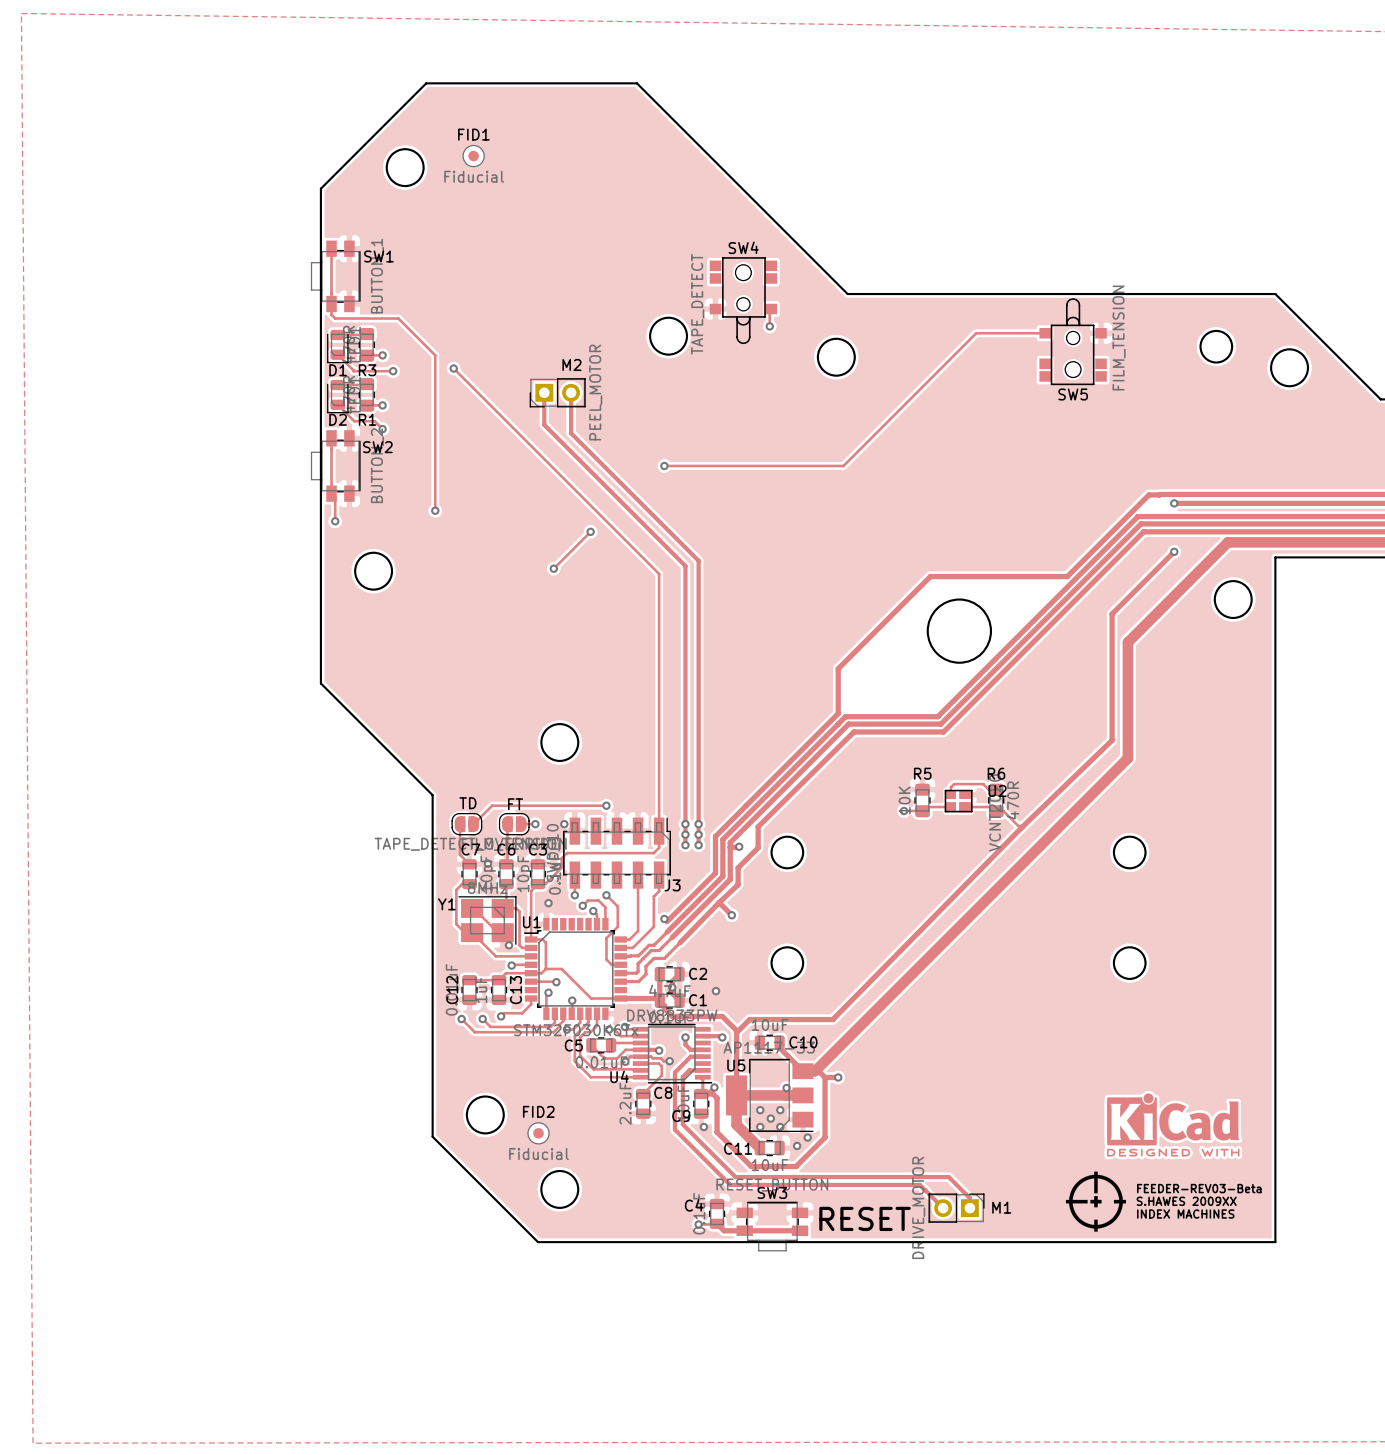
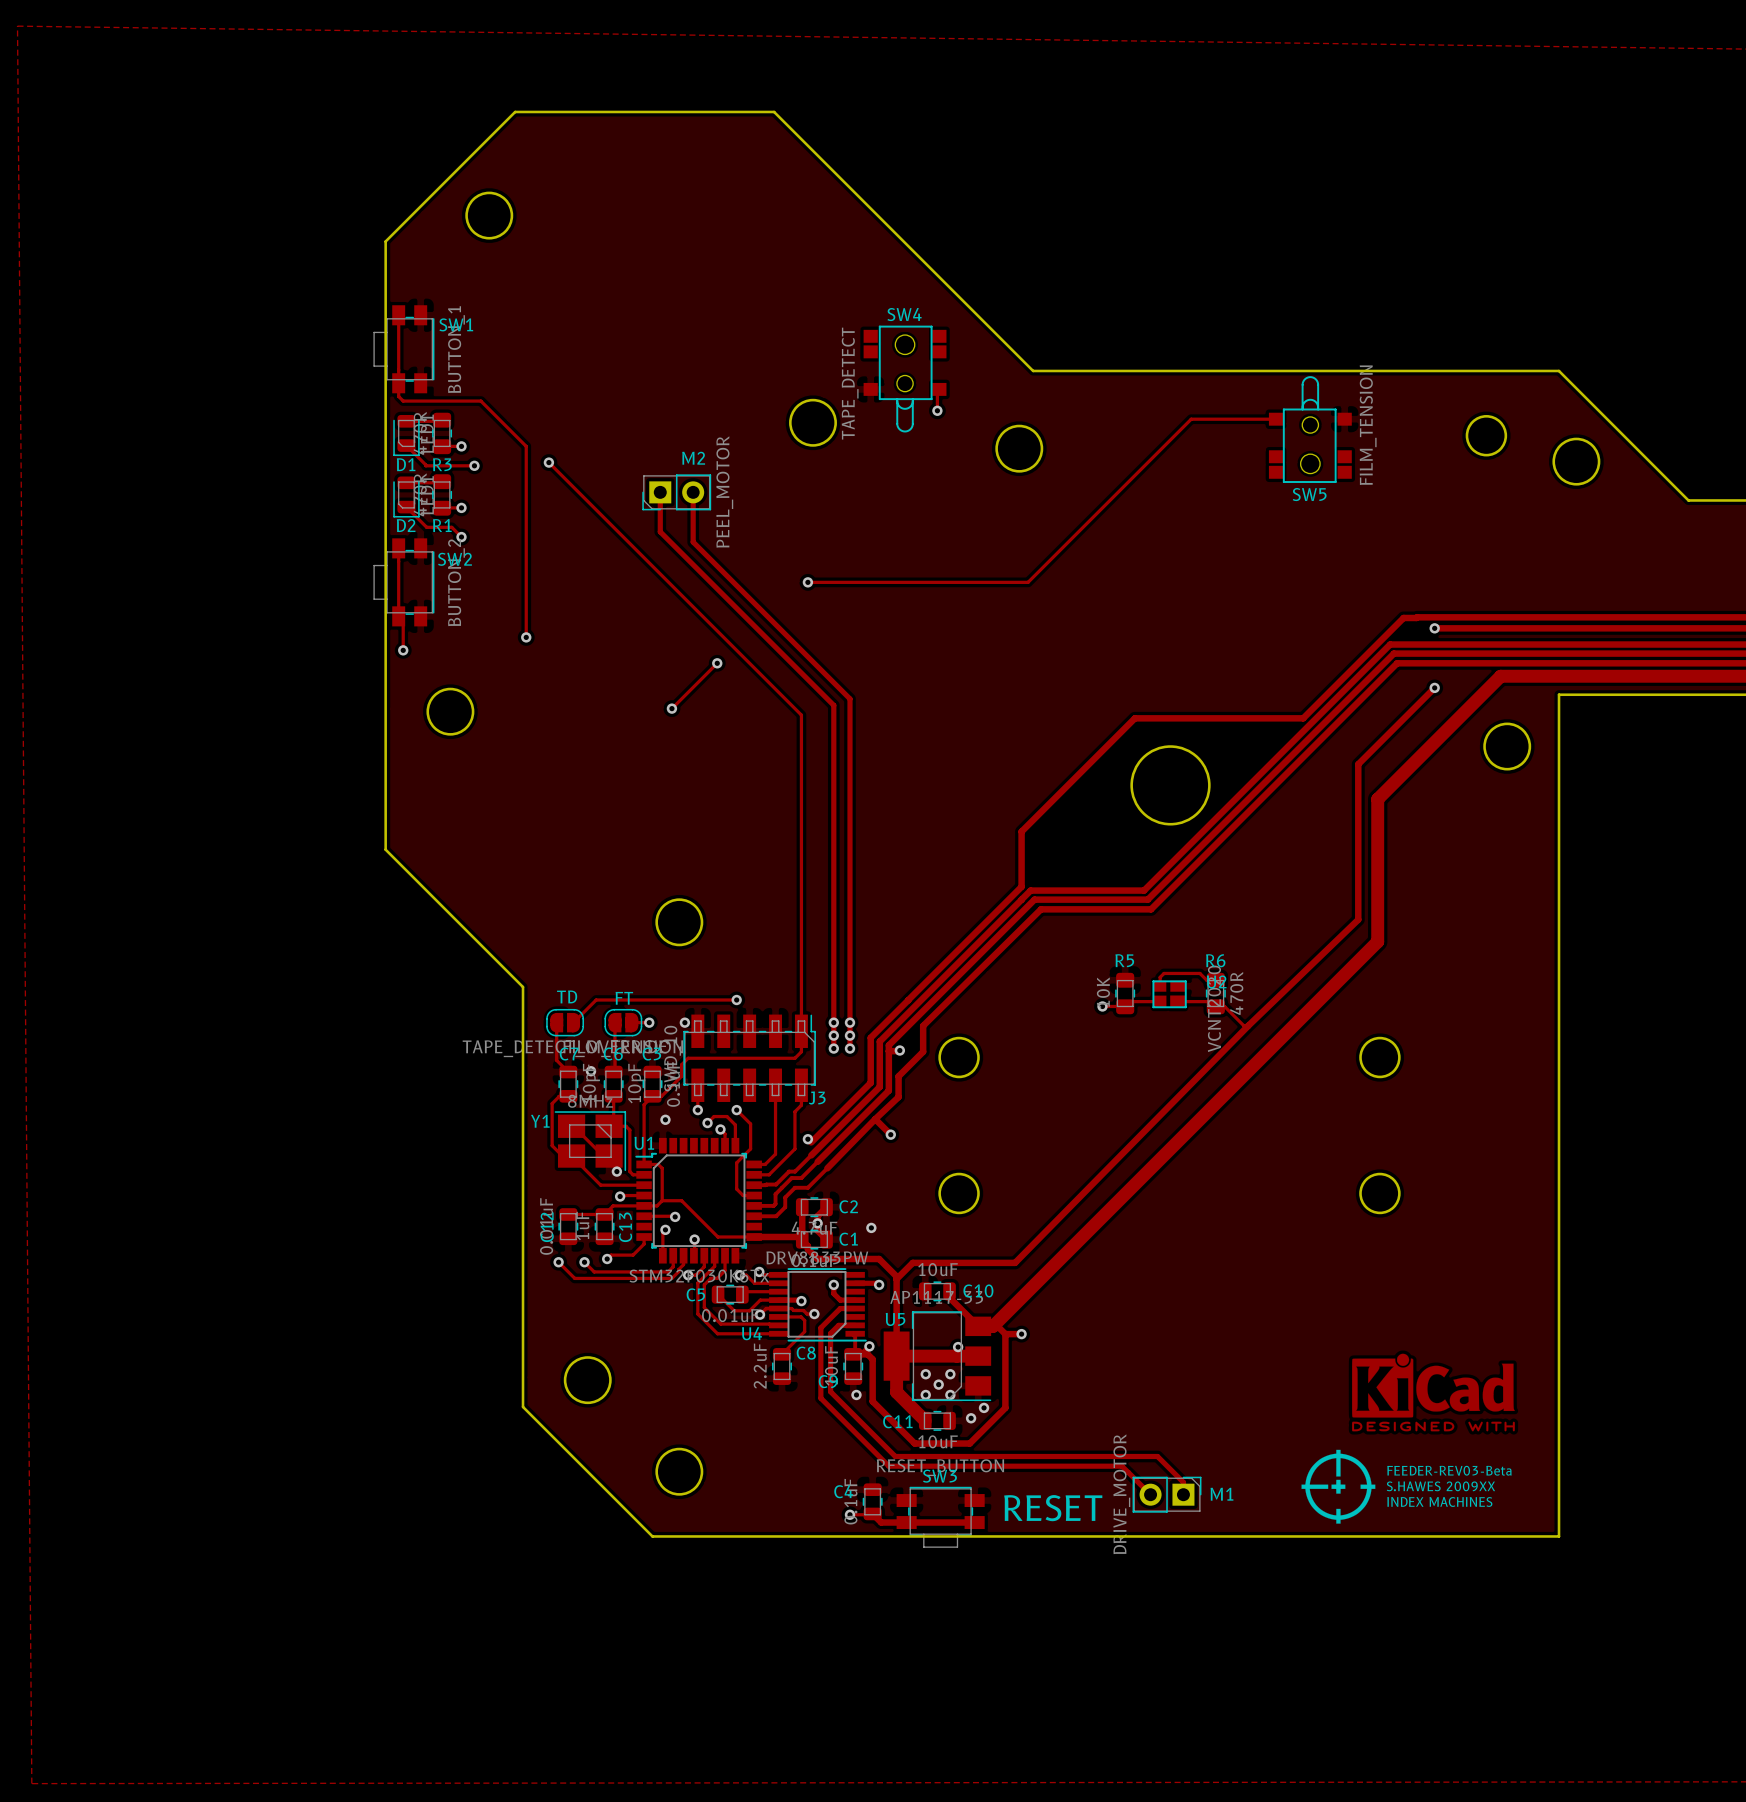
FID1: Fiducial (473, 156) -> none
FID2: Fiducial (538, 1133) -> none

